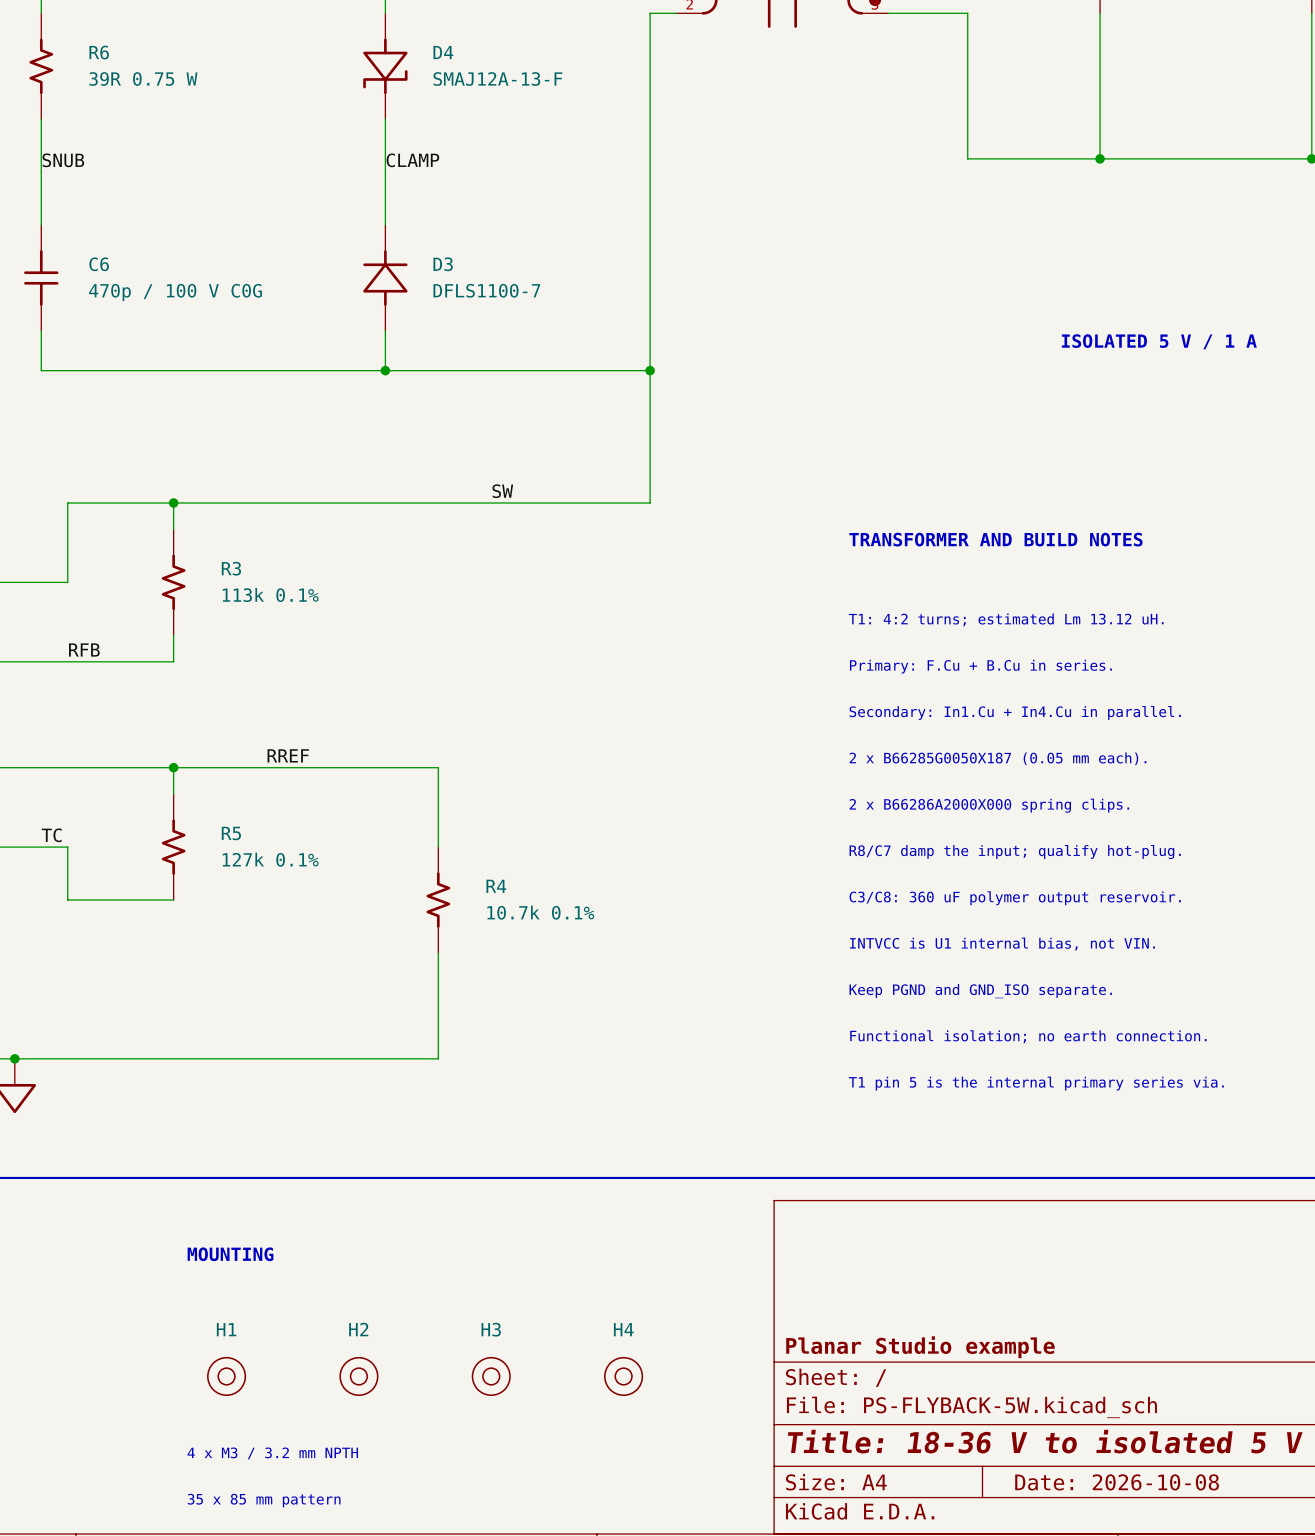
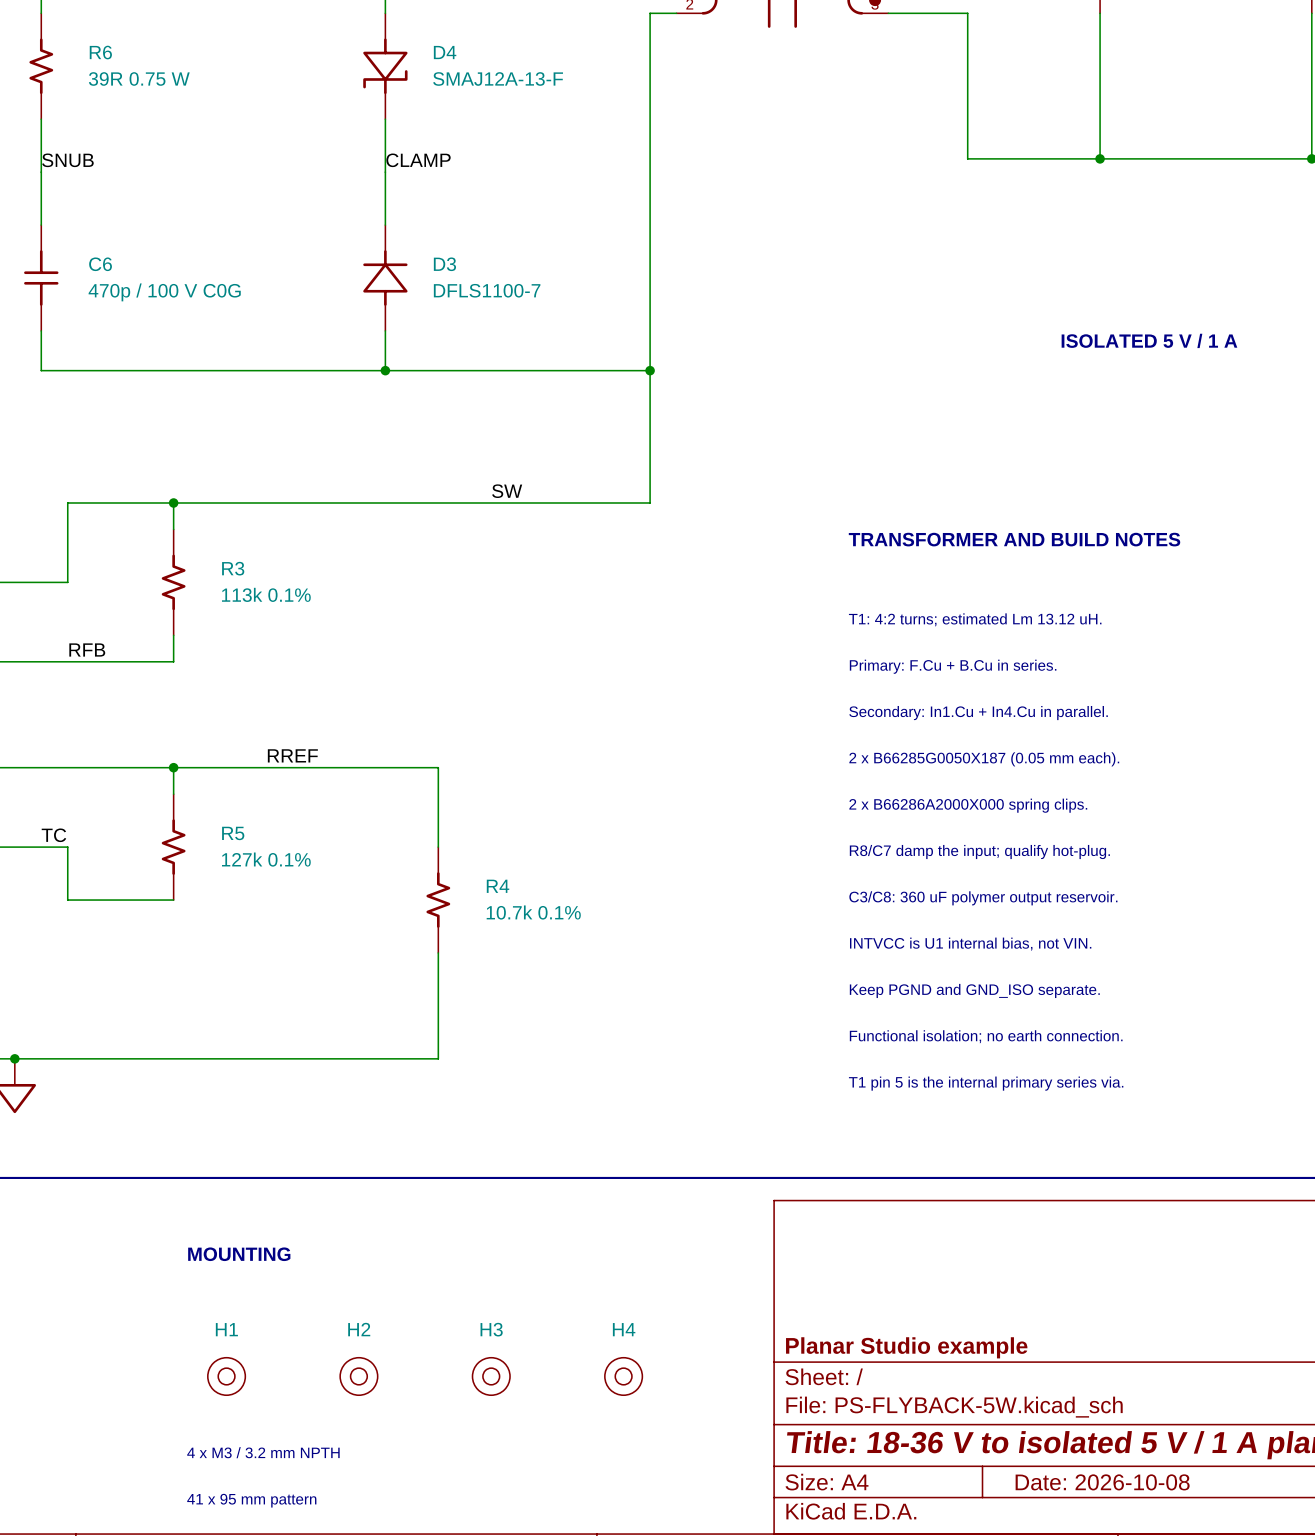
text: 35 x 85 mm pattern (264, 1500) -> 41 x 95 mm pattern (251, 1500)

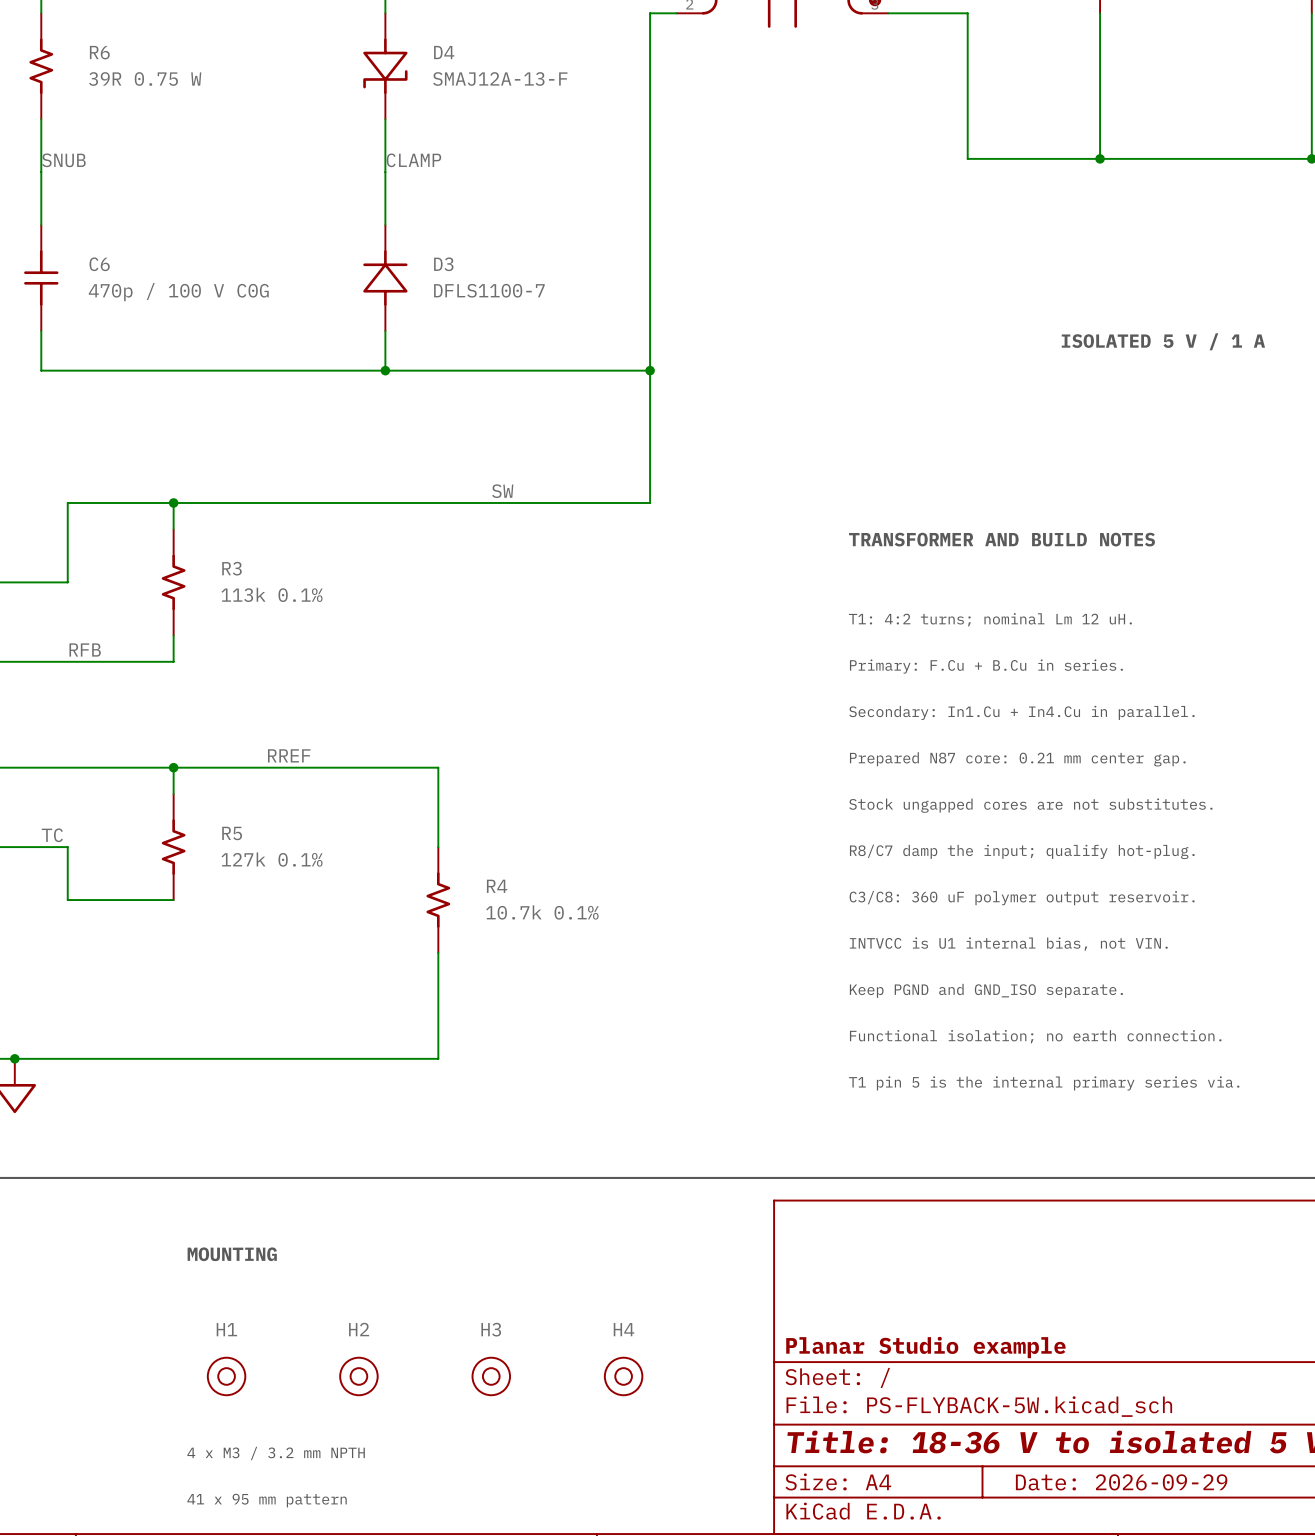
text: T1: 4:2 turns; estimated Lm 13.12 uH. (975, 619) -> T1: 4:2 turns; nominal Lm 12 uH. (990, 619)
text: 2 x B66285G0050X187 (0.05 mm each). (984, 759) -> Prepared N87 core: 0.21 mm center gap. (1017, 759)
text: 2 x B66286A2000X000 spring clips. (968, 805) -> Stock ungapped cores are not substitutes. (1030, 805)
title block: Date: 2026-10-08 (1102, 1482) -> Date: 2026-09-29 (1121, 1482)

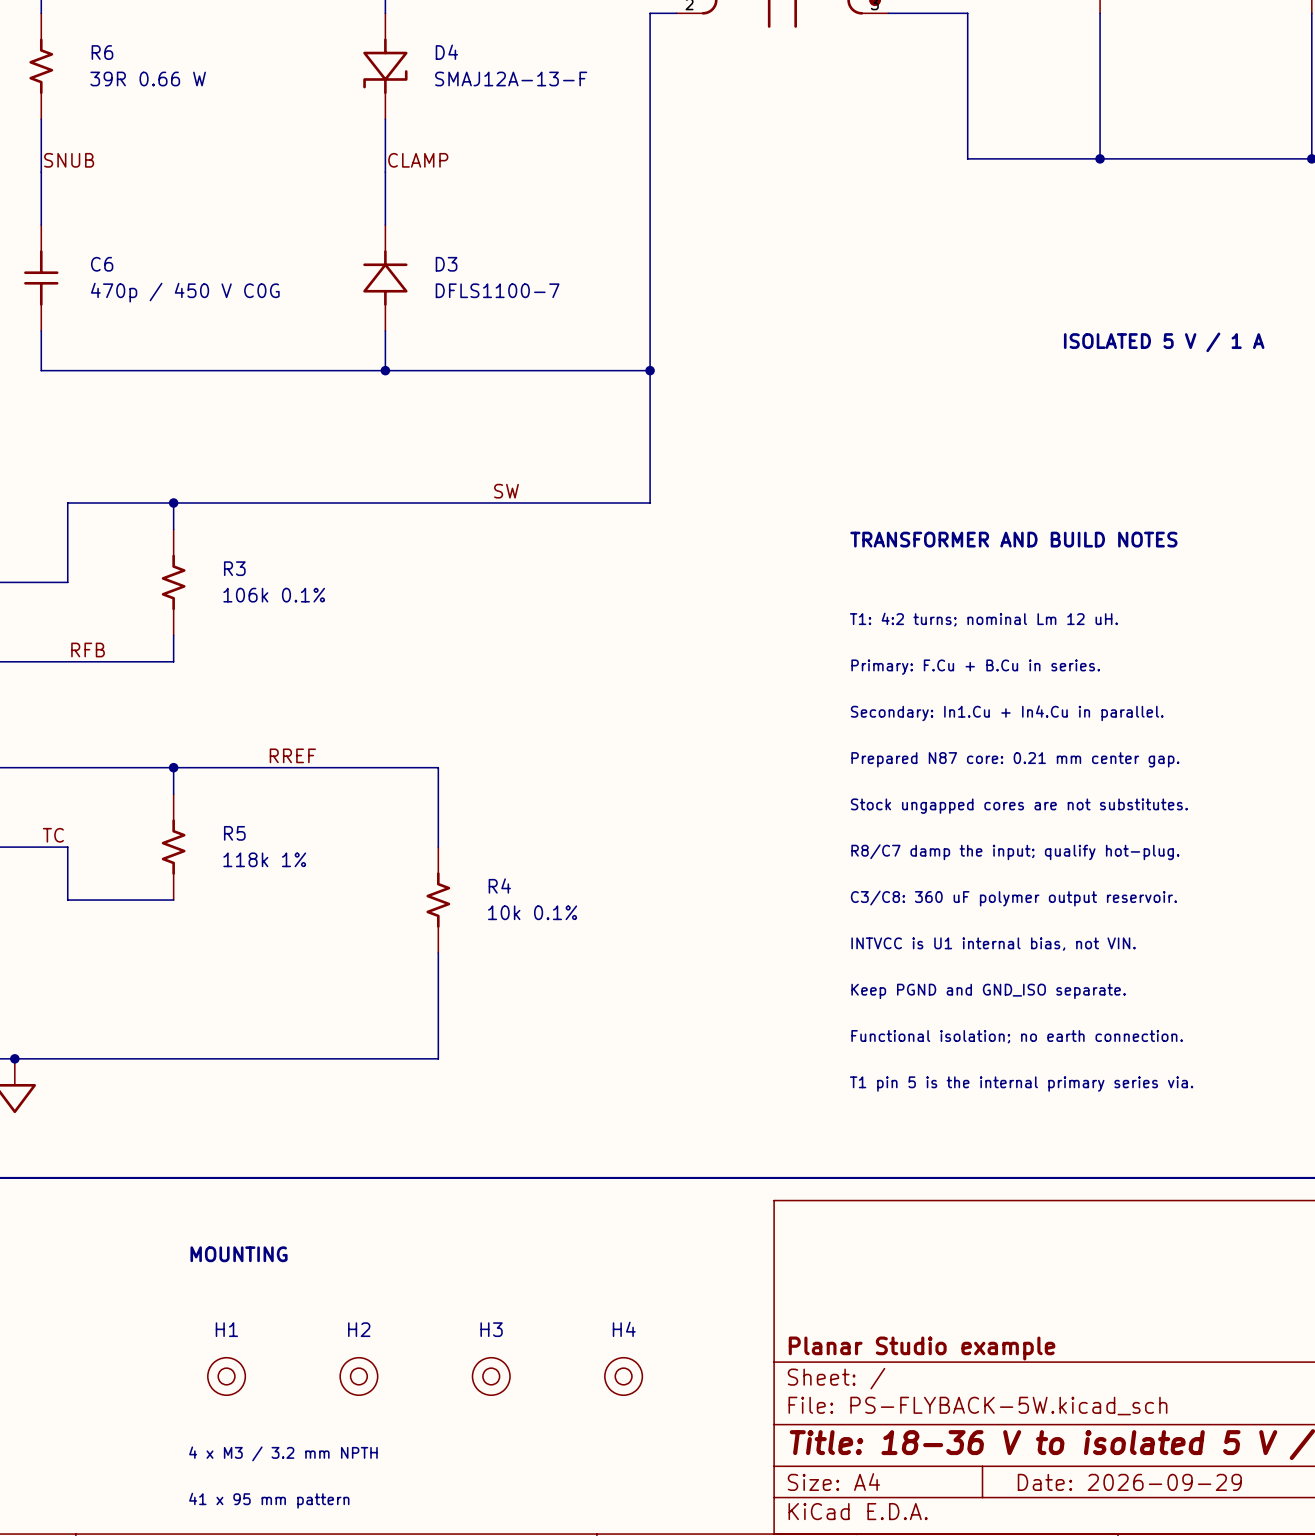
R6 value: 39R 0.75 W (145, 78) -> 39R 0.66 W (148, 78)
C6 value: 470p / 100 V C0G (178, 292) -> 470p / 450 V C0G (185, 292)
R3 value: 113k 0.1% (272, 594) -> 106k 0.1% (274, 595)
R5 value: 127k 0.1% (272, 859) -> 118k 1% (264, 859)
R4 value: 10.7k 0.1% (542, 912) -> 10k 0.1% (532, 912)

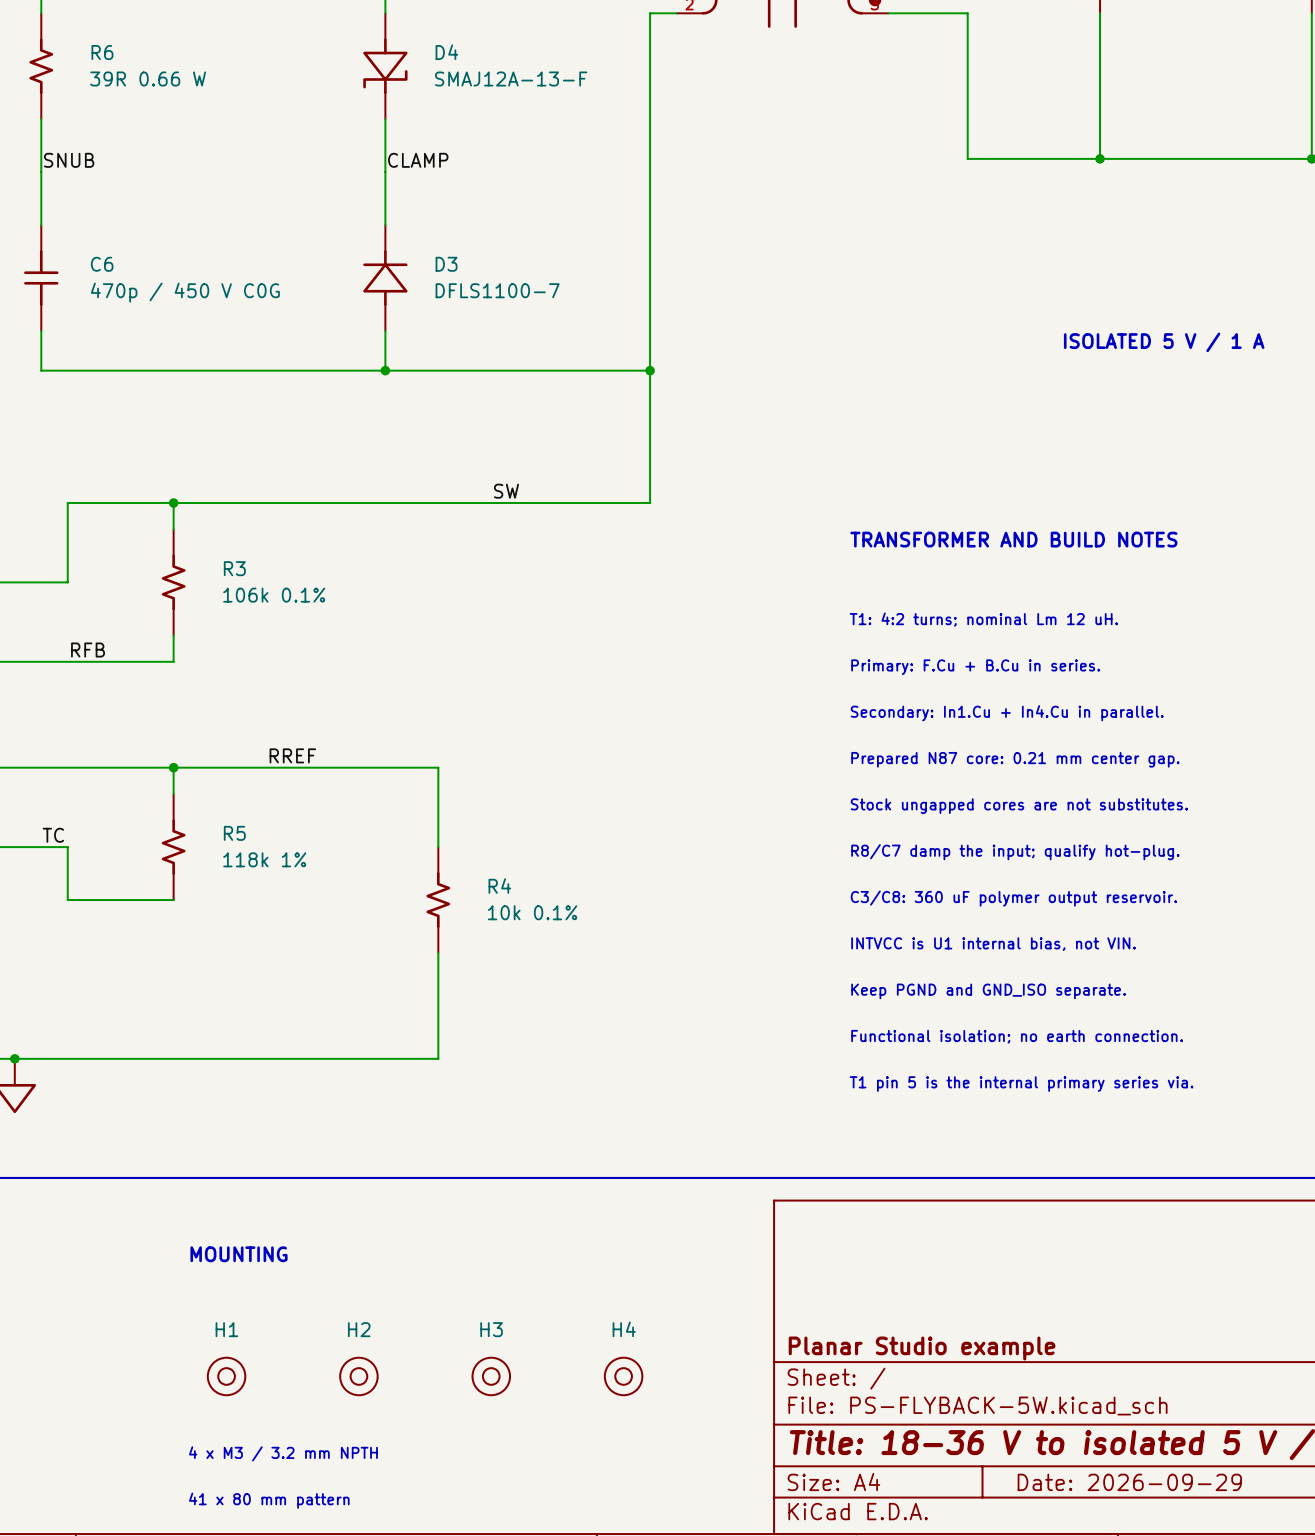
text: 41 x 95 mm pattern (269, 1500) -> 41 x 80 mm pattern (269, 1500)

